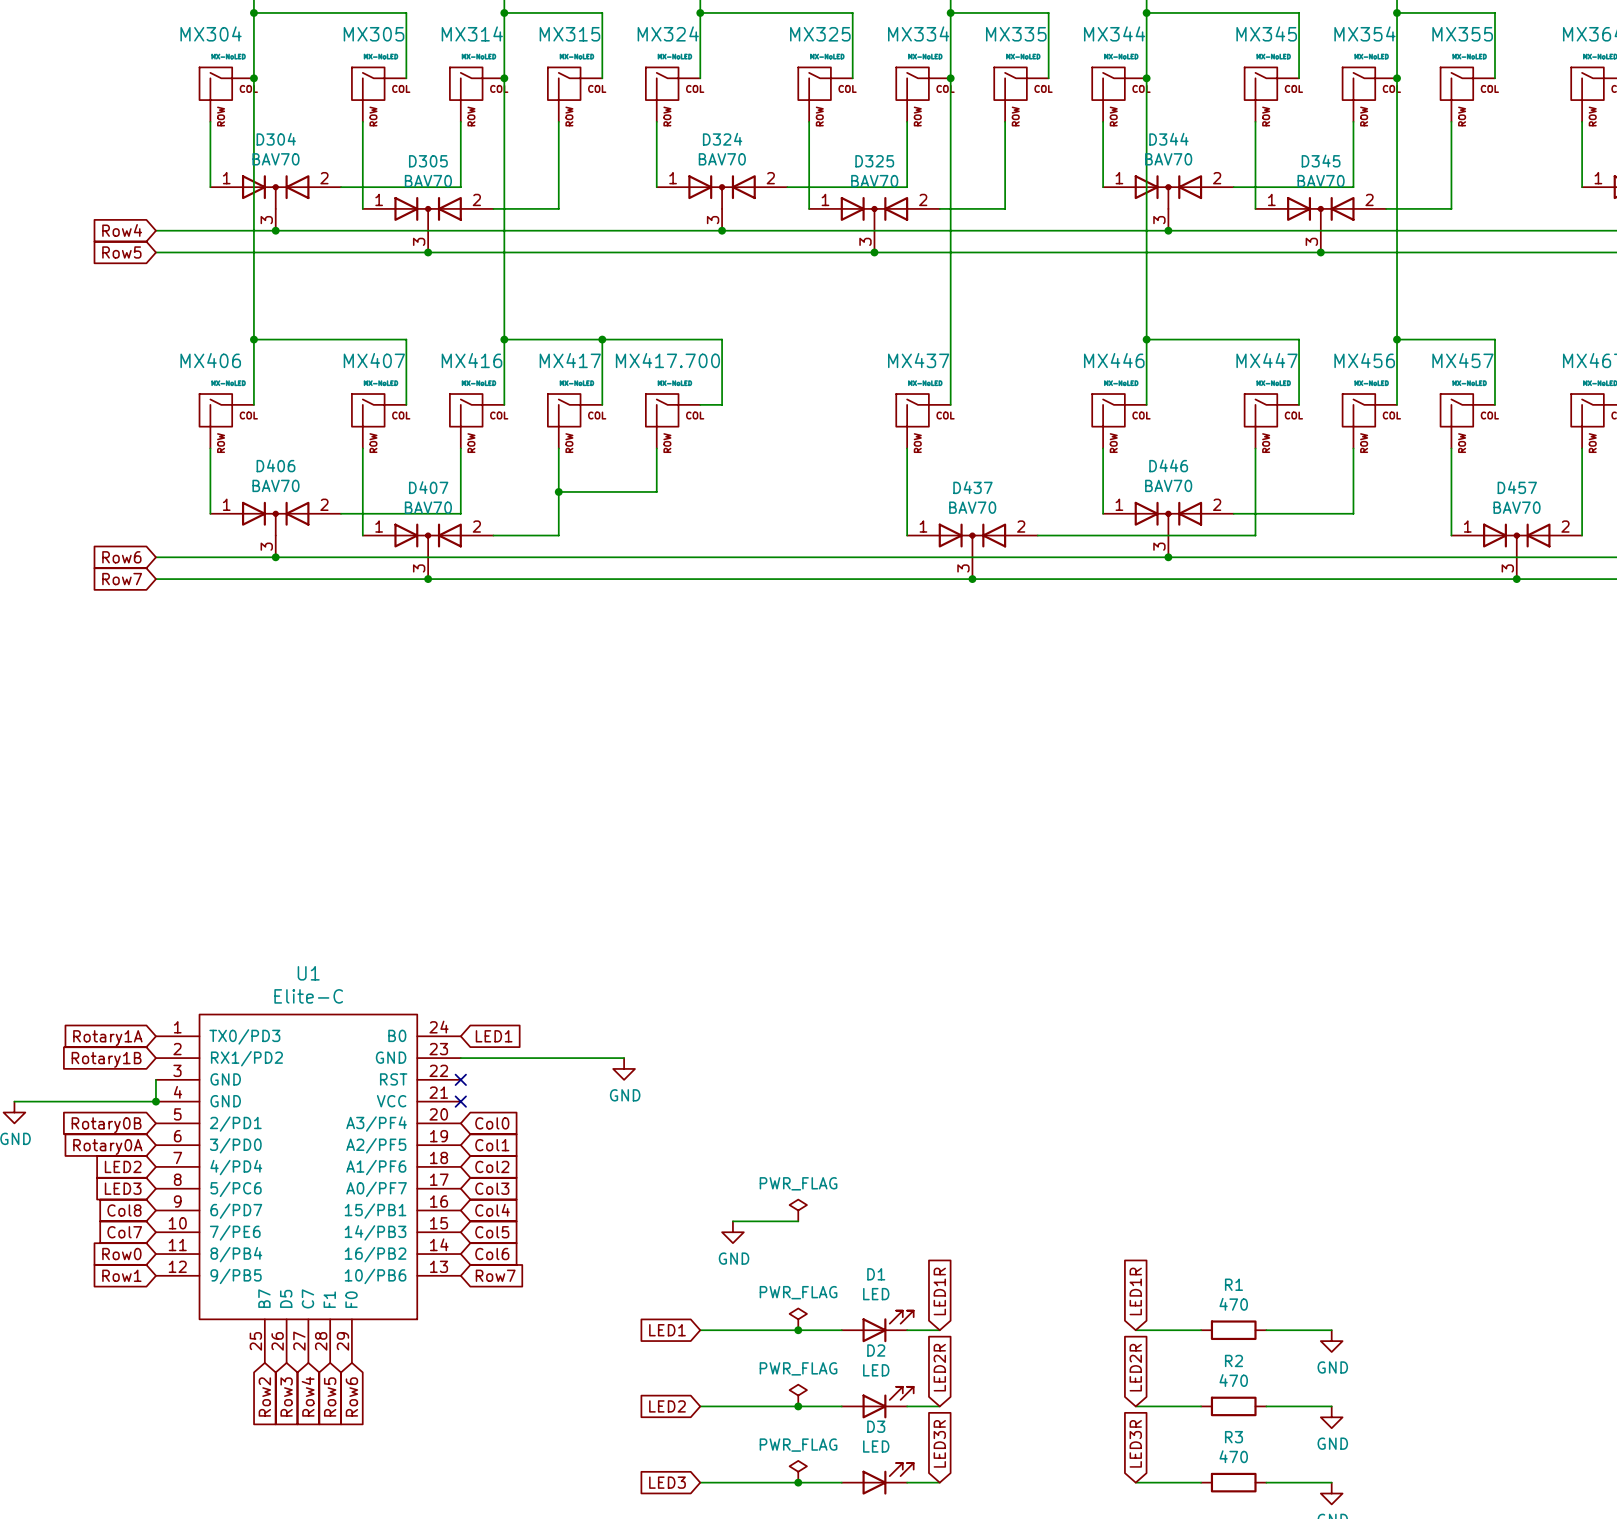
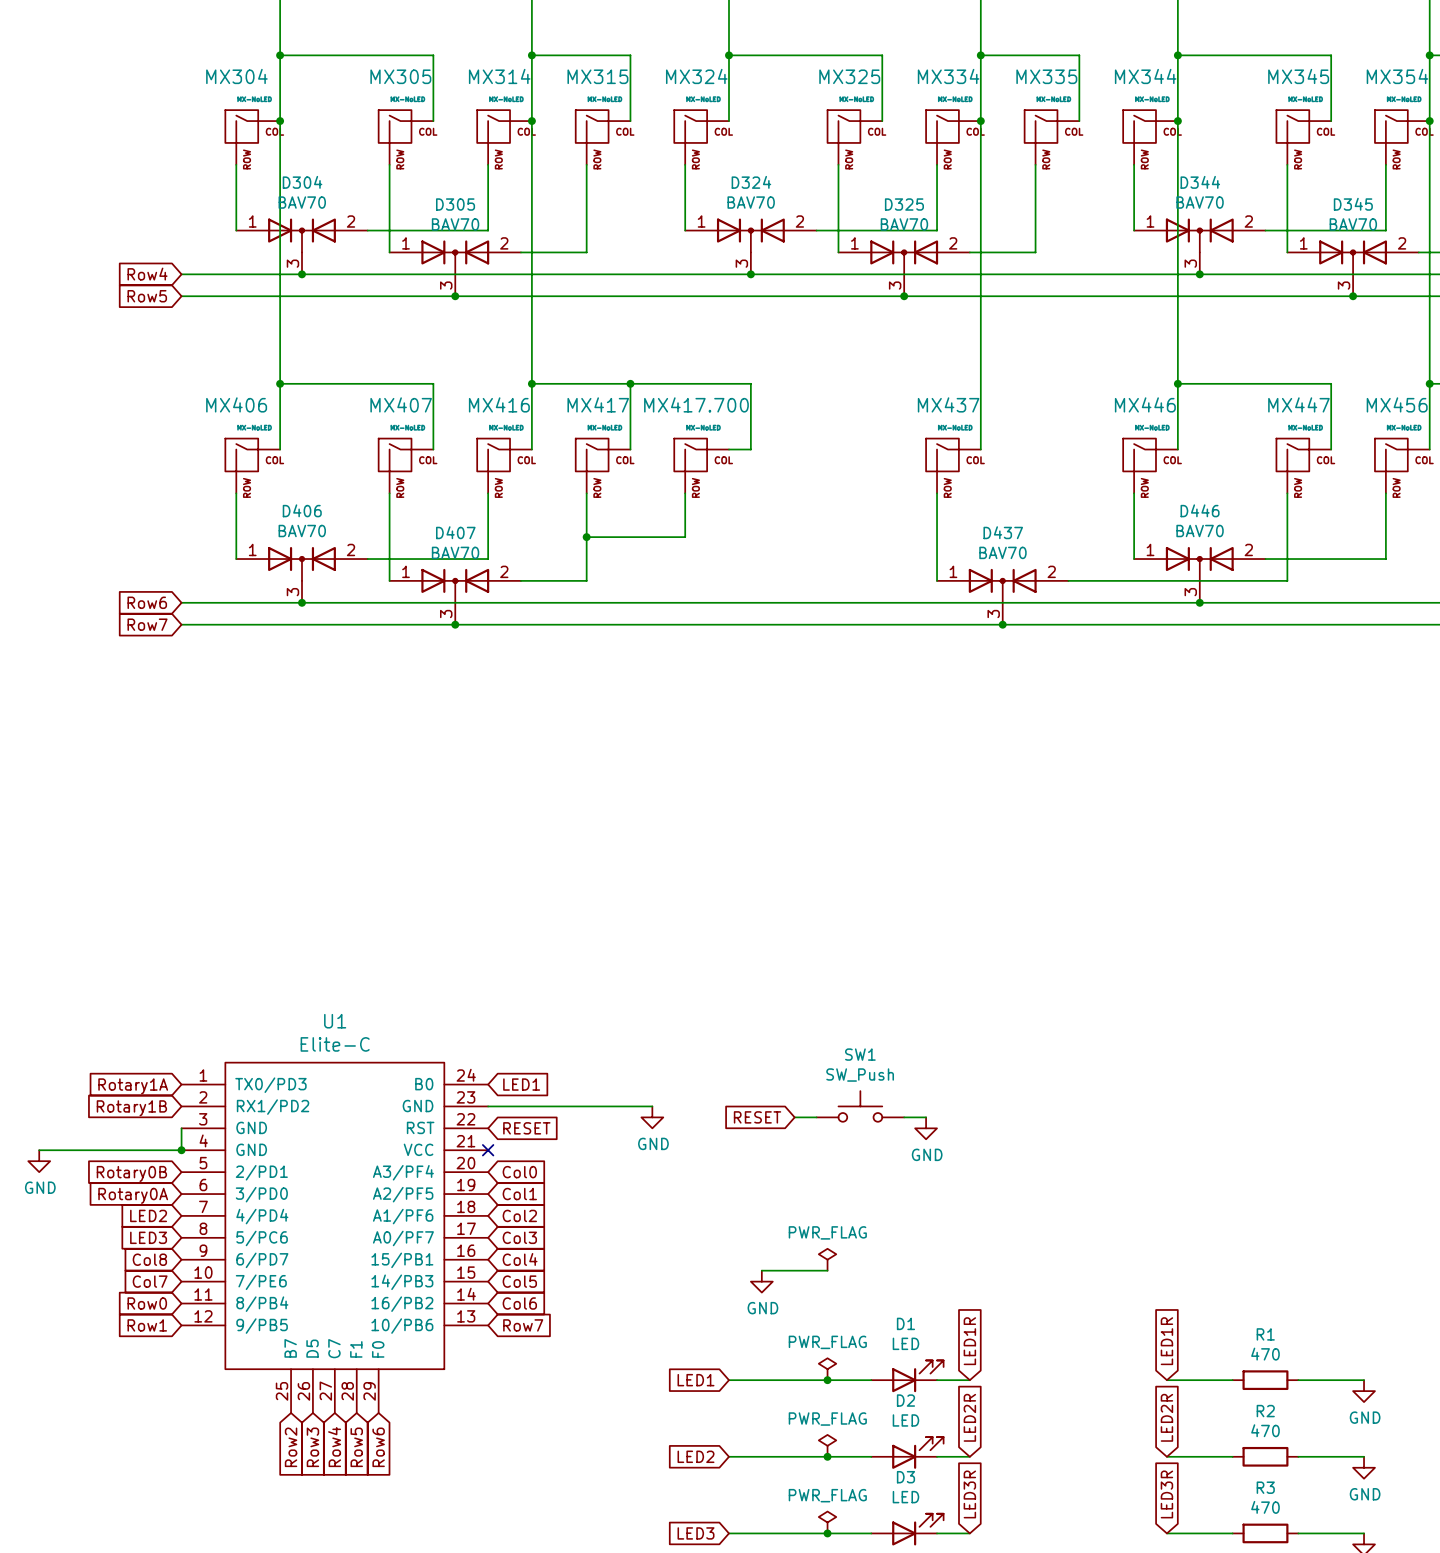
SW1: none -> SW_Push (860, 1106)
global label: none -> RESET (757, 1117)
wire: none -> (794, 1117) (816, 1117)
wire: none -> (904, 1117) (926, 1117)
no-connect mark: (460, 1079) -> none
global label: none -> RESET (526, 1128)
power symbol: none -> GND (926, 1128)

